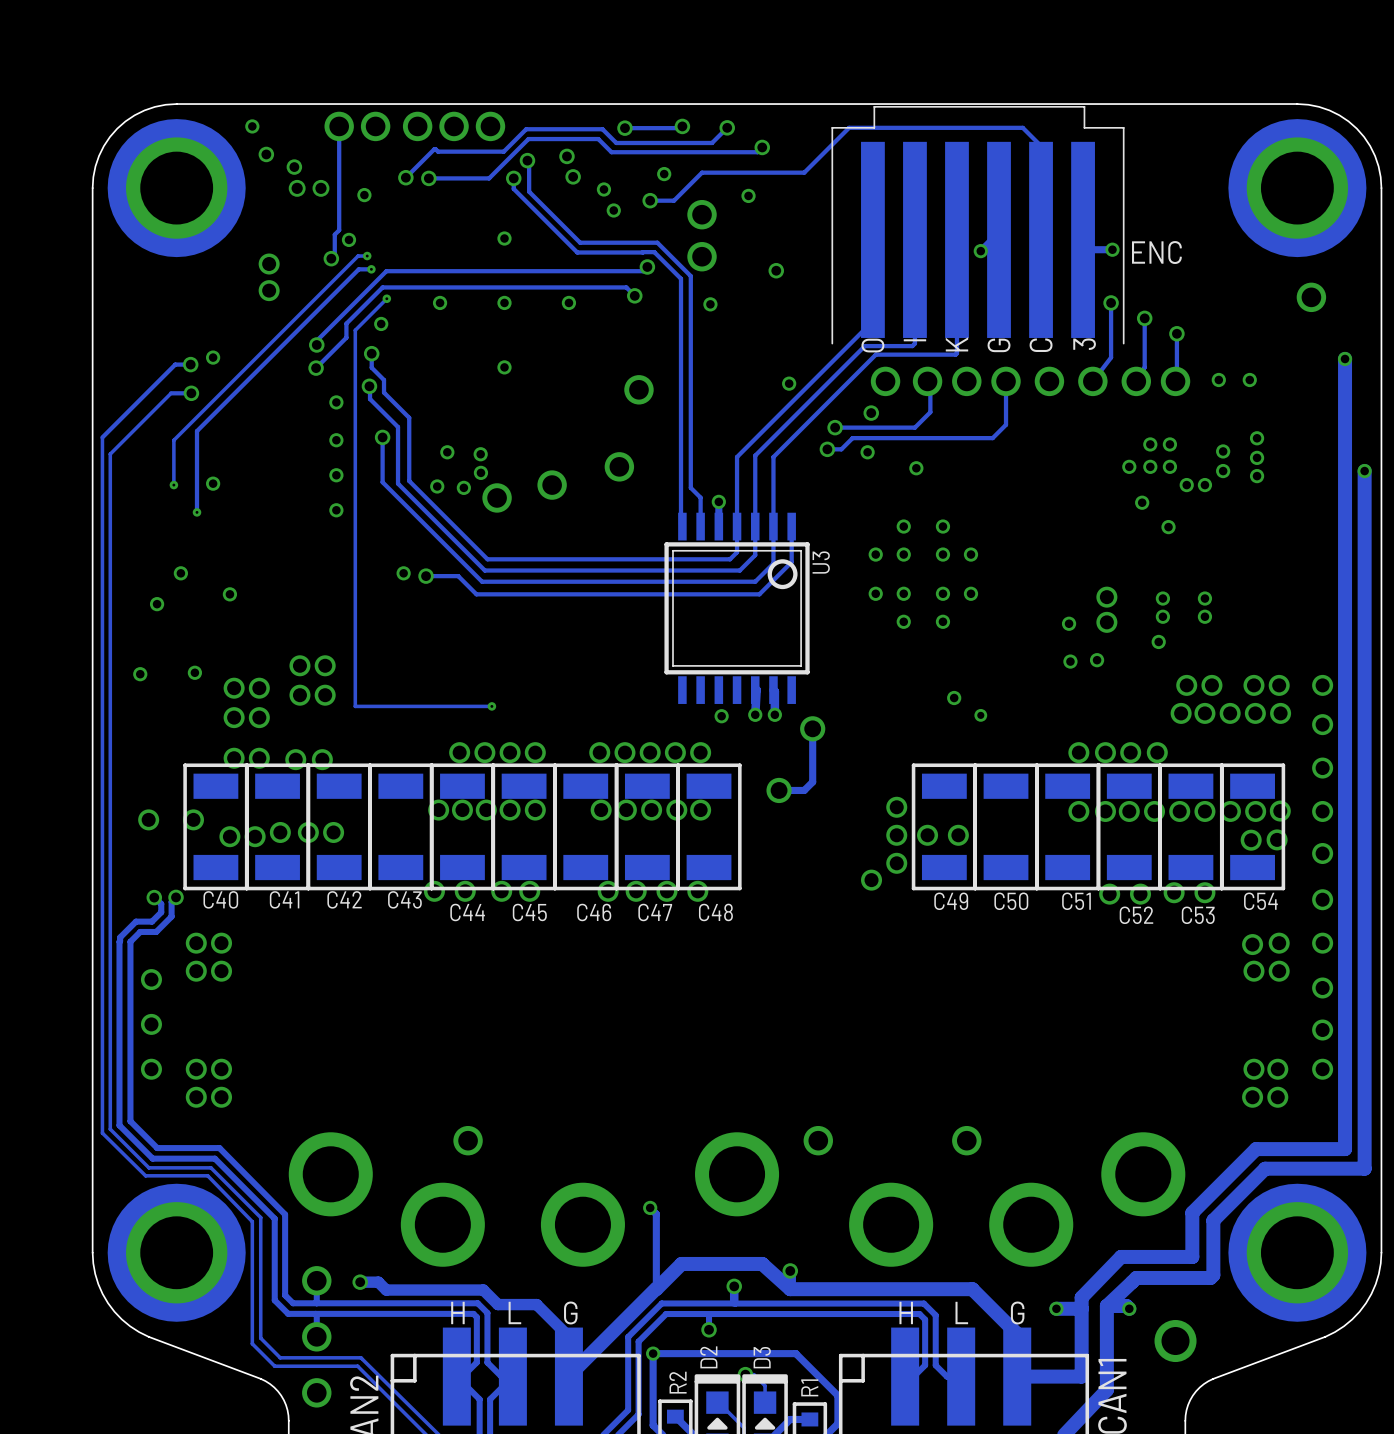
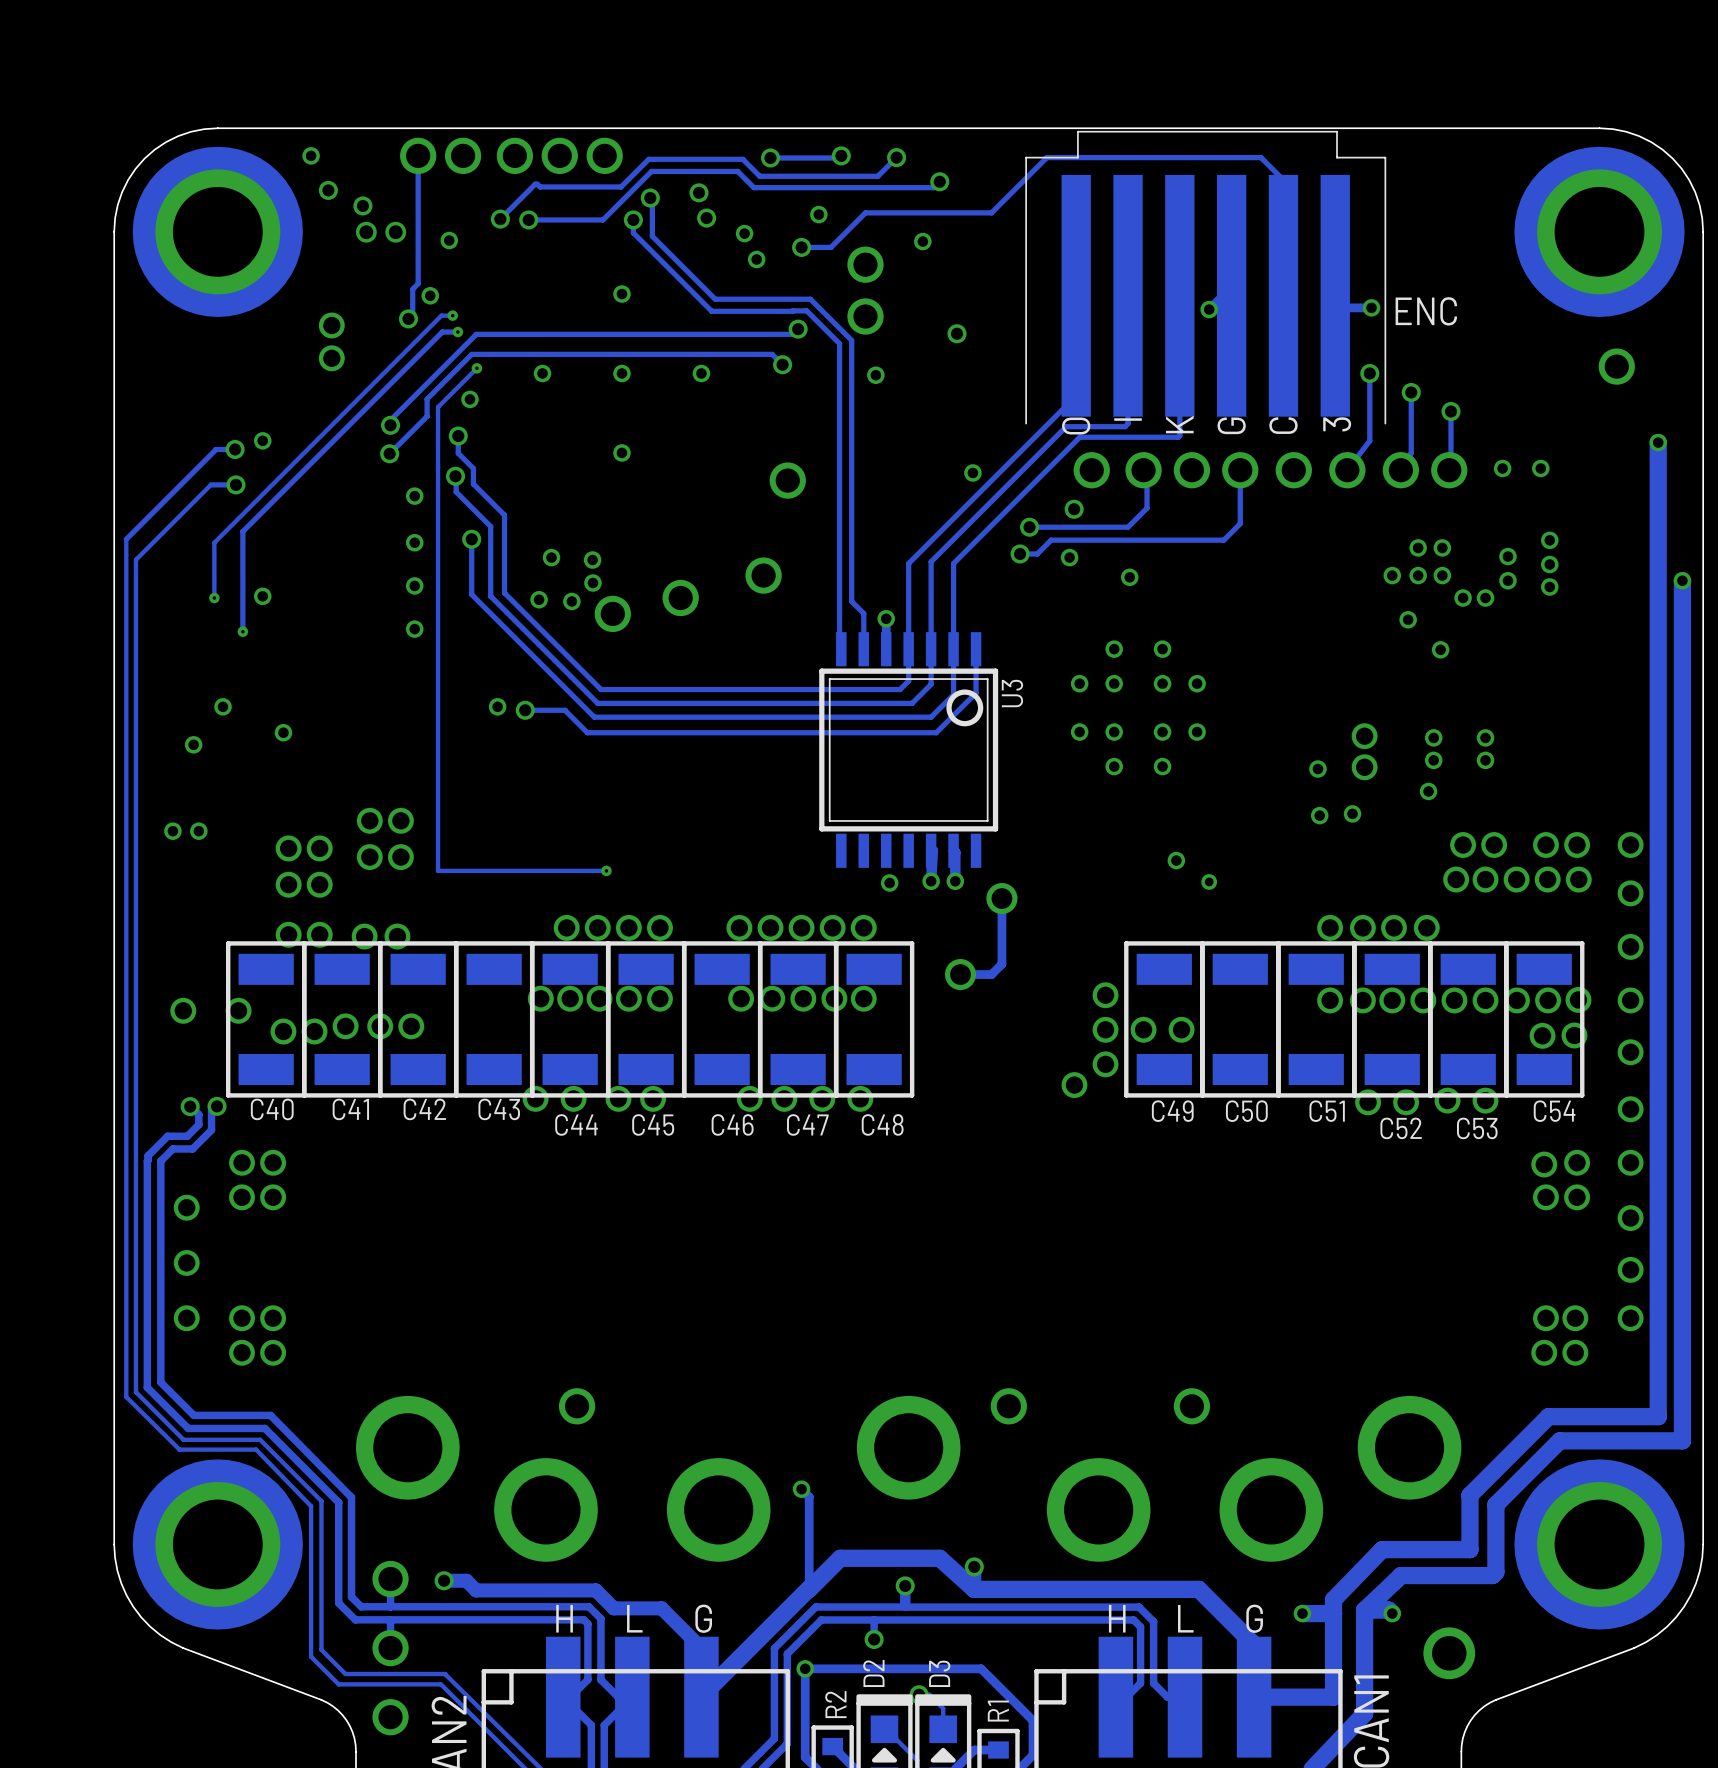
via position: (194, 672) -> (198, 831)

